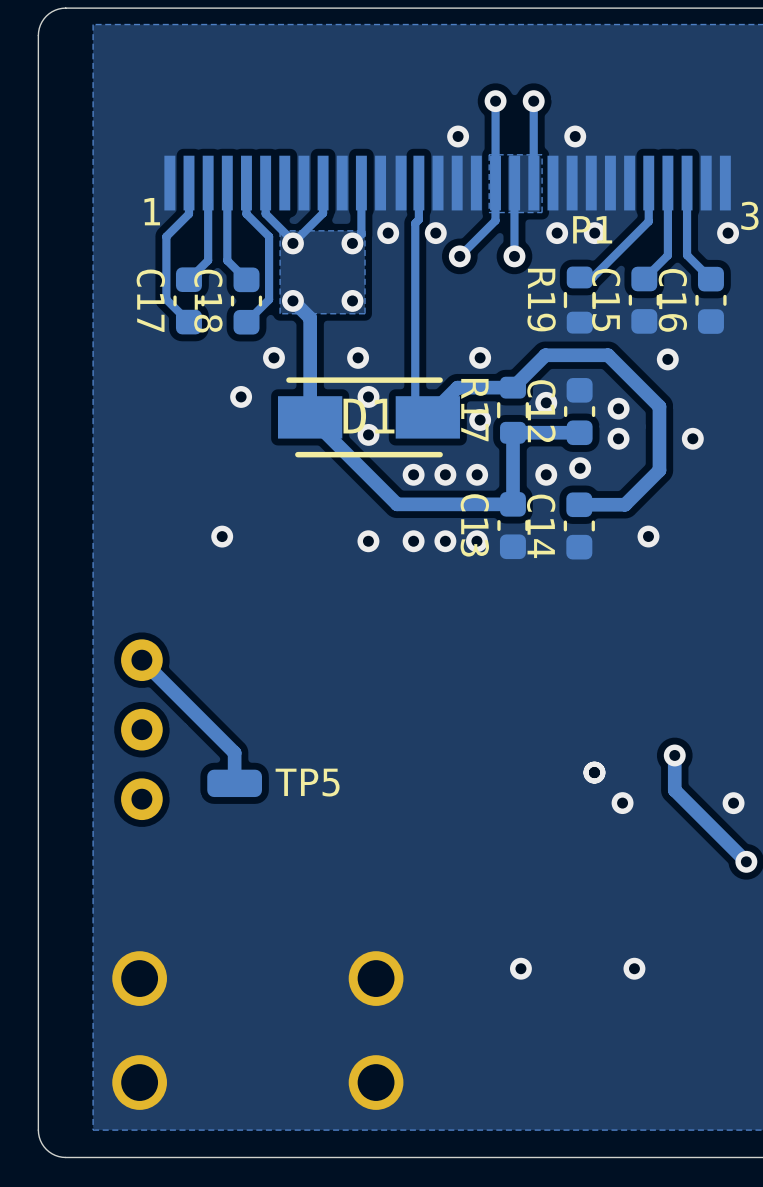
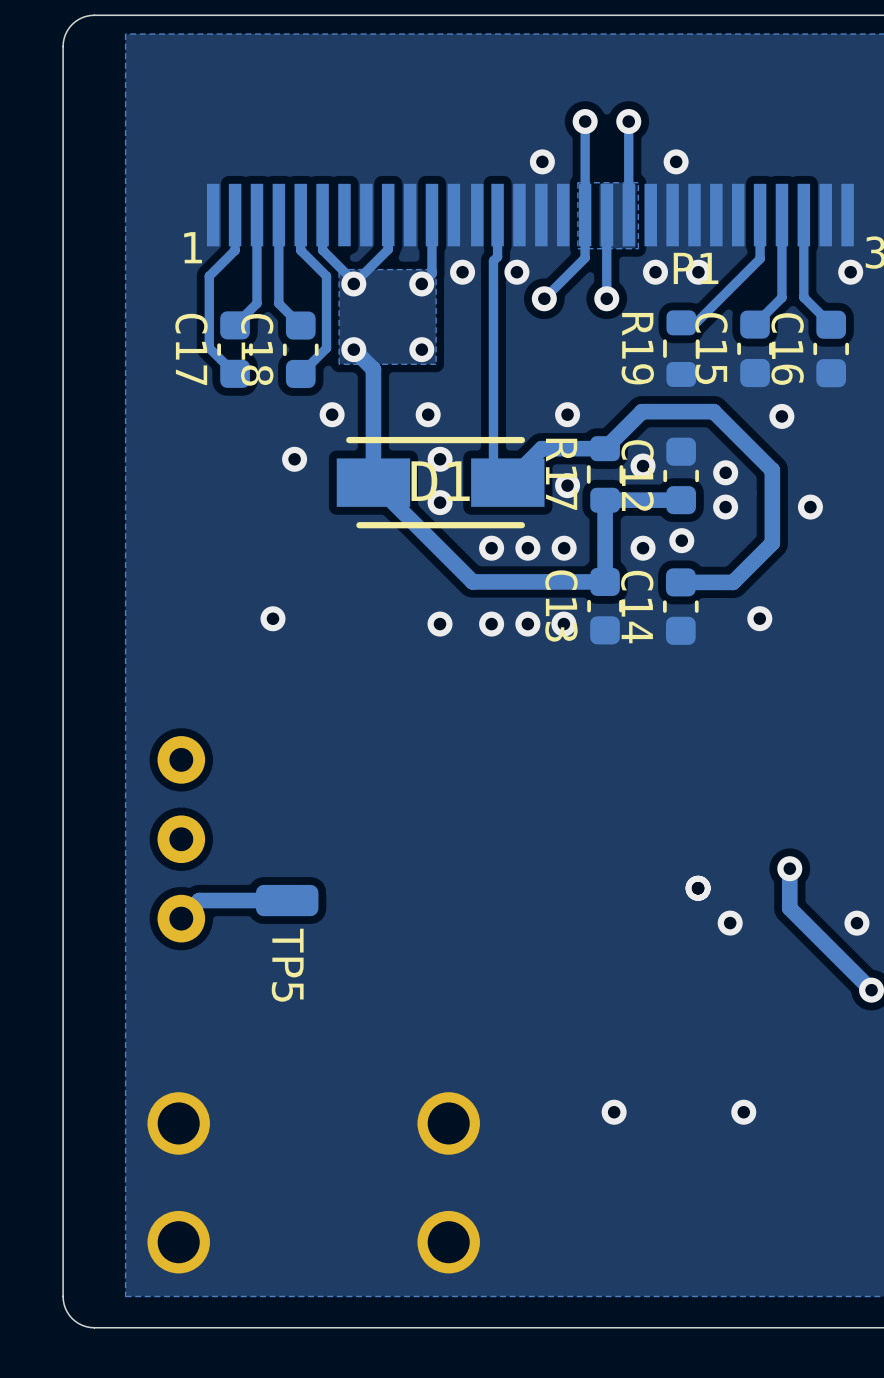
track: (141, 660) (234, 752) (234, 783) -> (181, 918) (199, 900) (287, 900)
TP5 name rotation: 0° (307, 782) -> 90° clockwise (287, 965)
TP5 name position: TP5 (307, 782) -> TP5 (287, 965)

